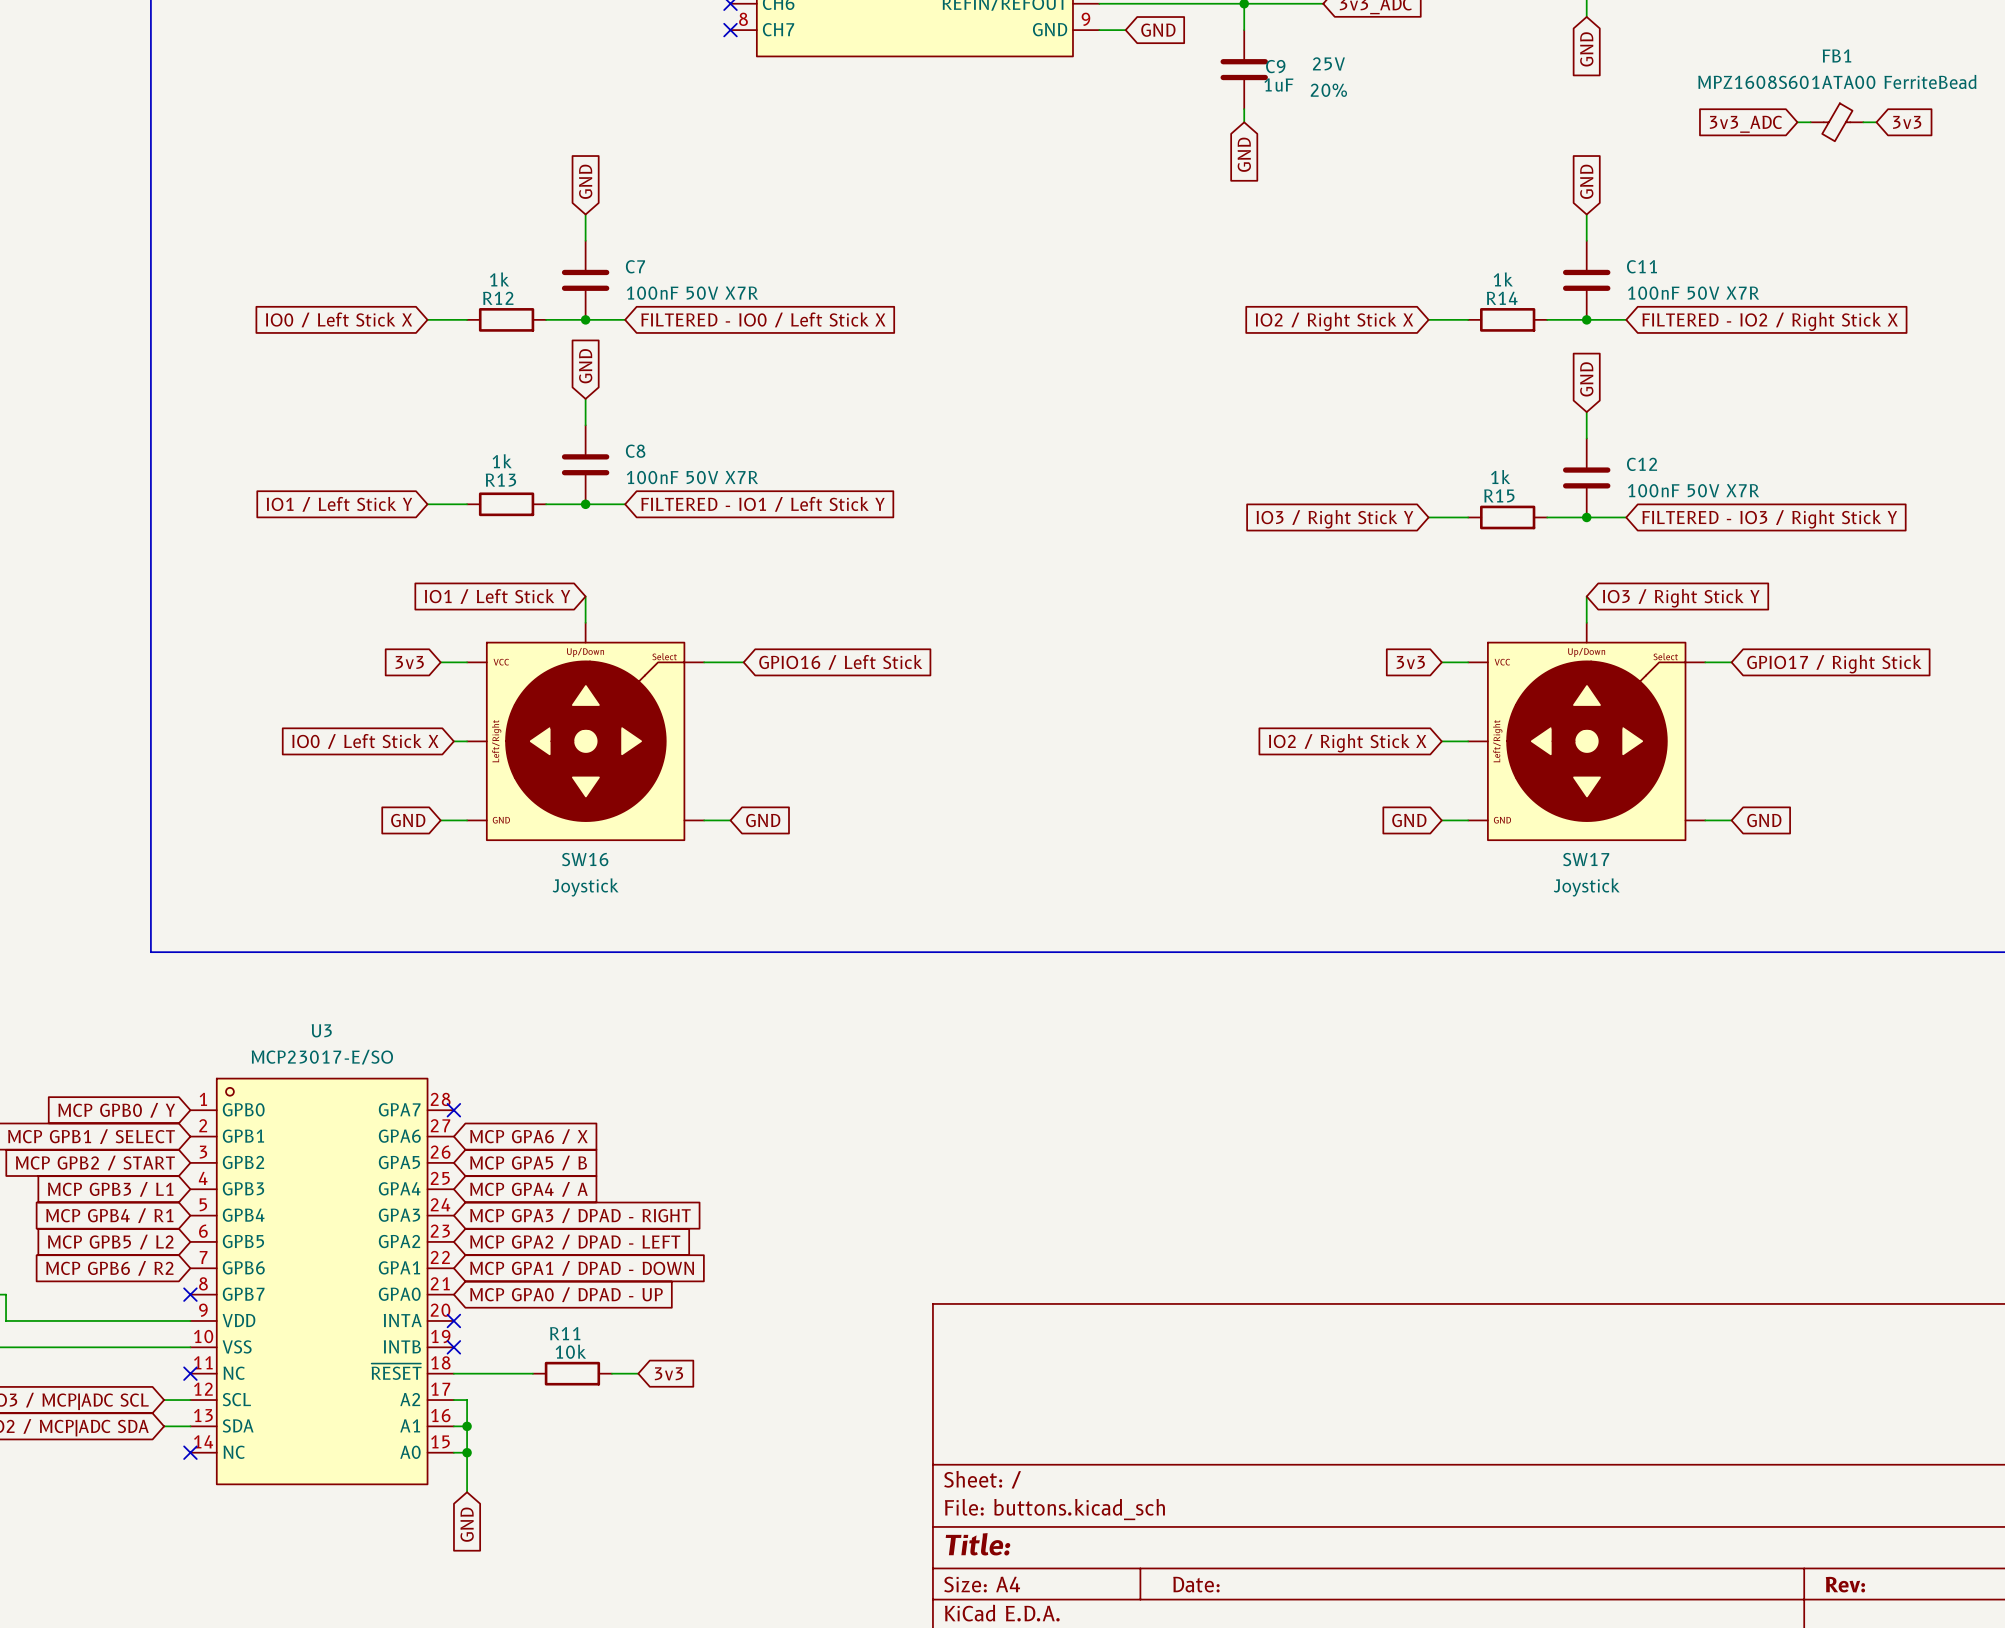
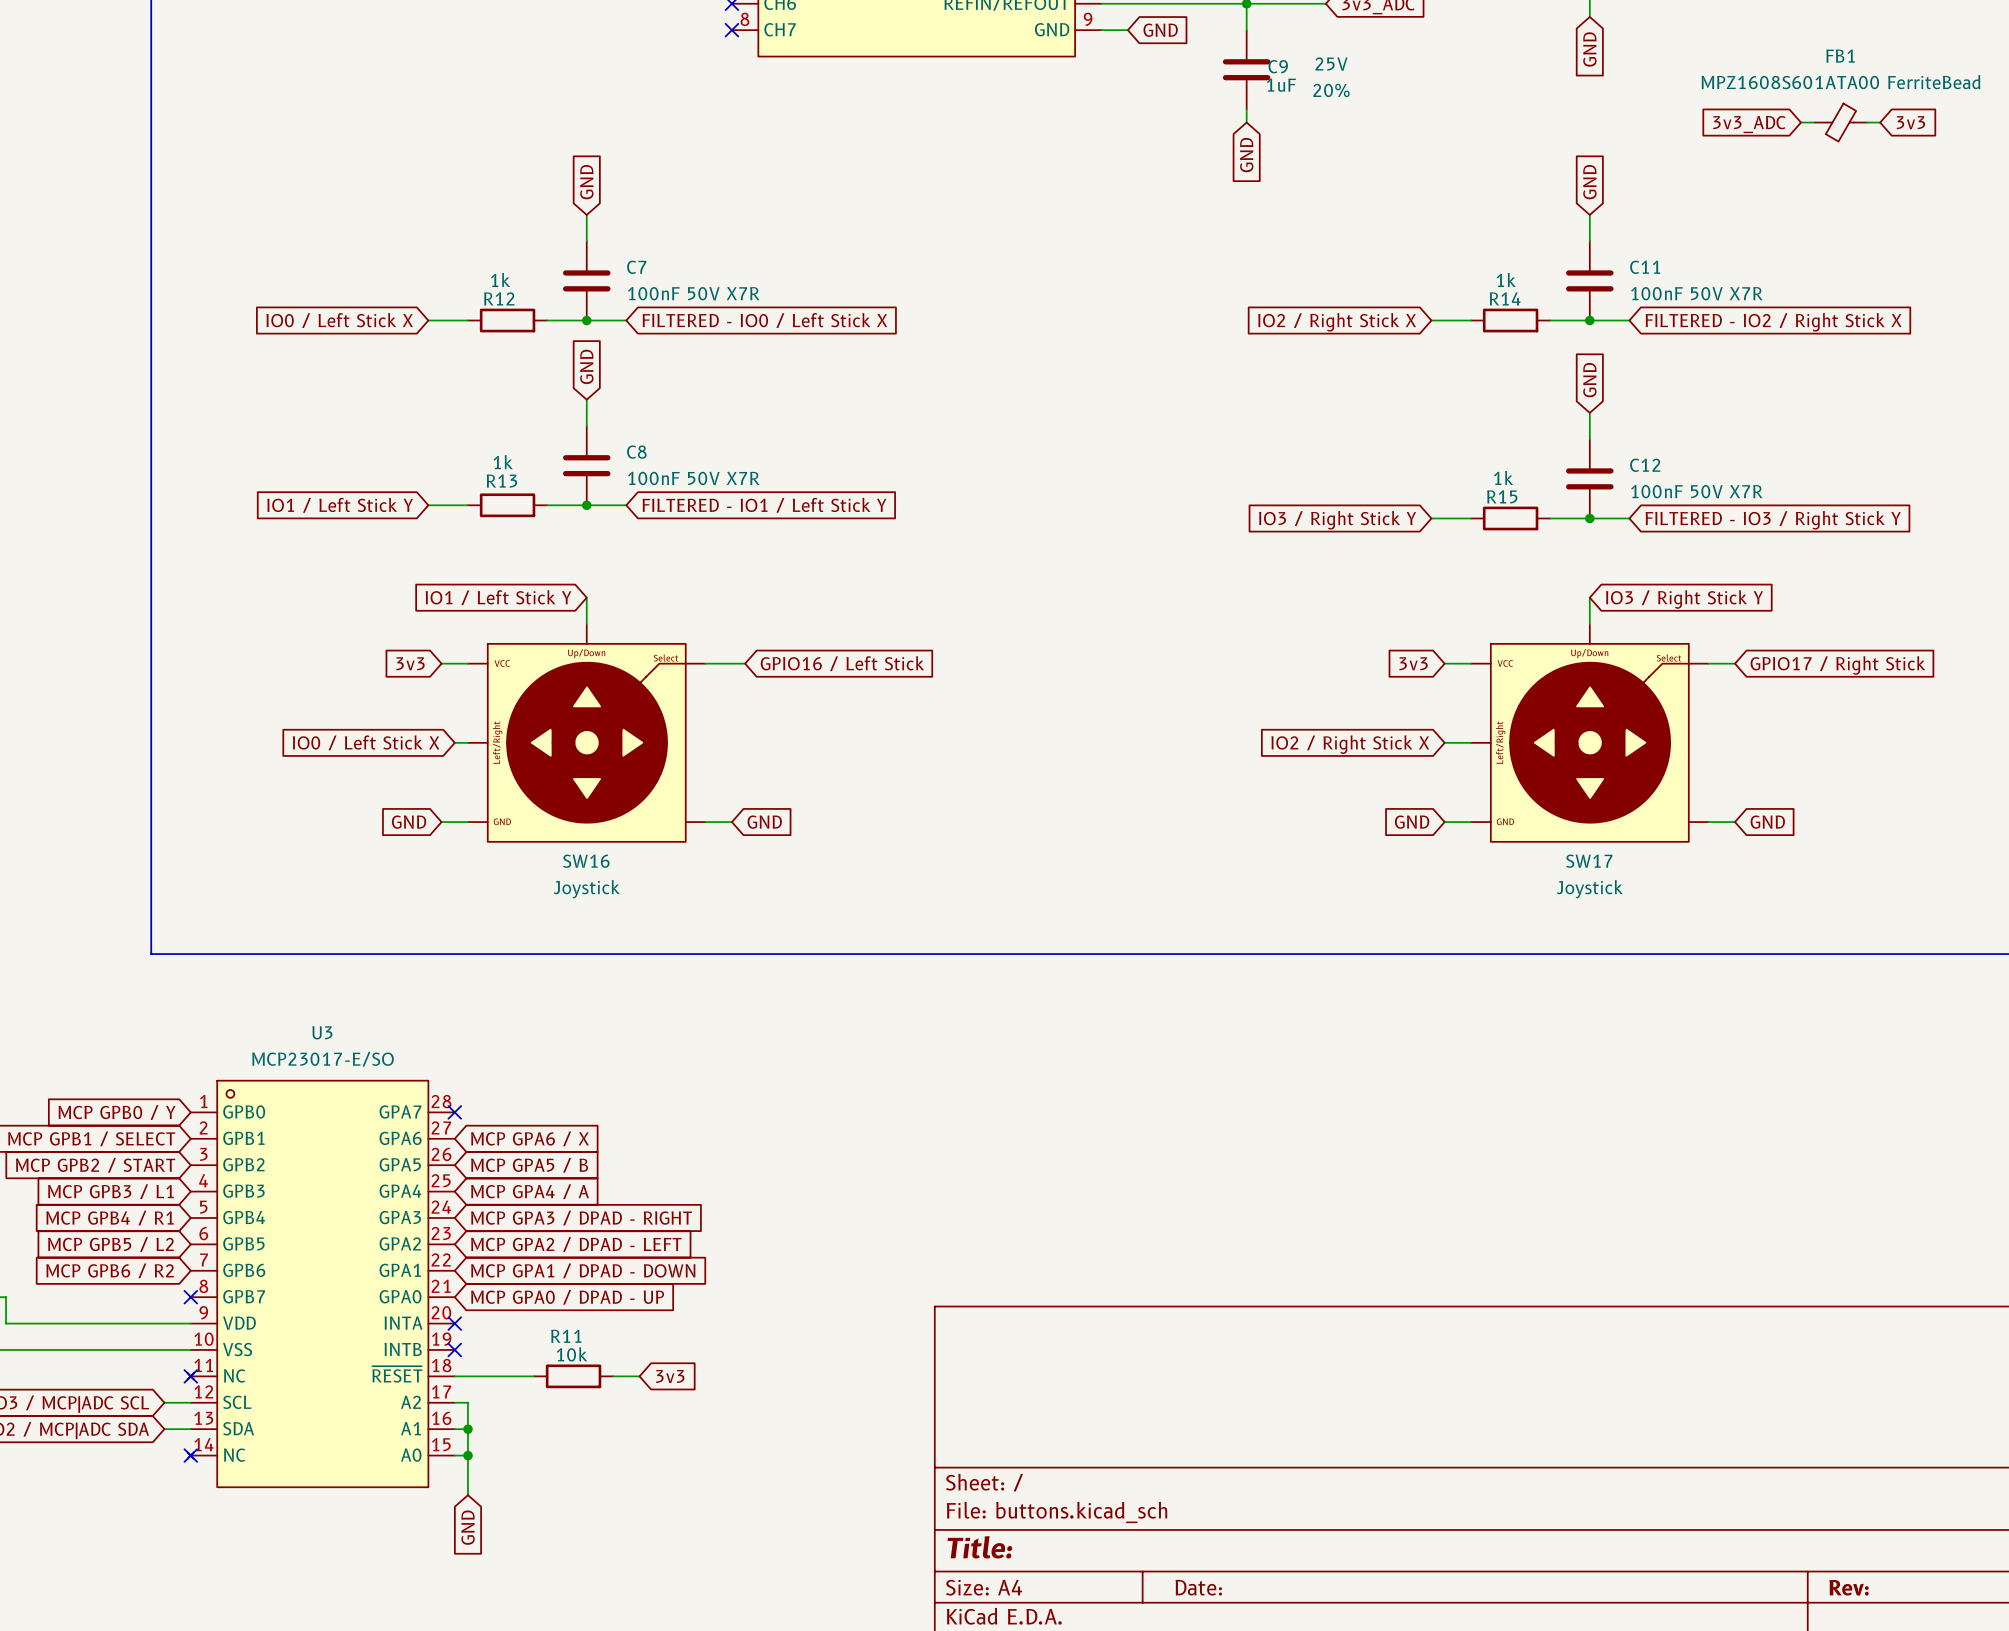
U3 symbol: [190, 1078, 454, 1485] -> [187, 1080, 455, 1488]

